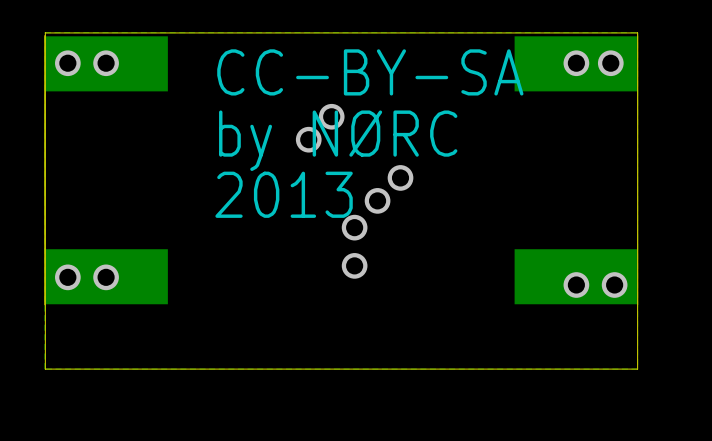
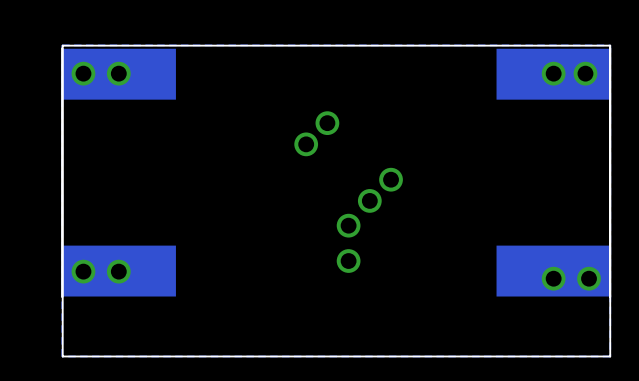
text: CC-BY-SA (370, 72) -> none
text: by NØRC (338, 140) -> none
text: 2013 (284, 194) -> none

